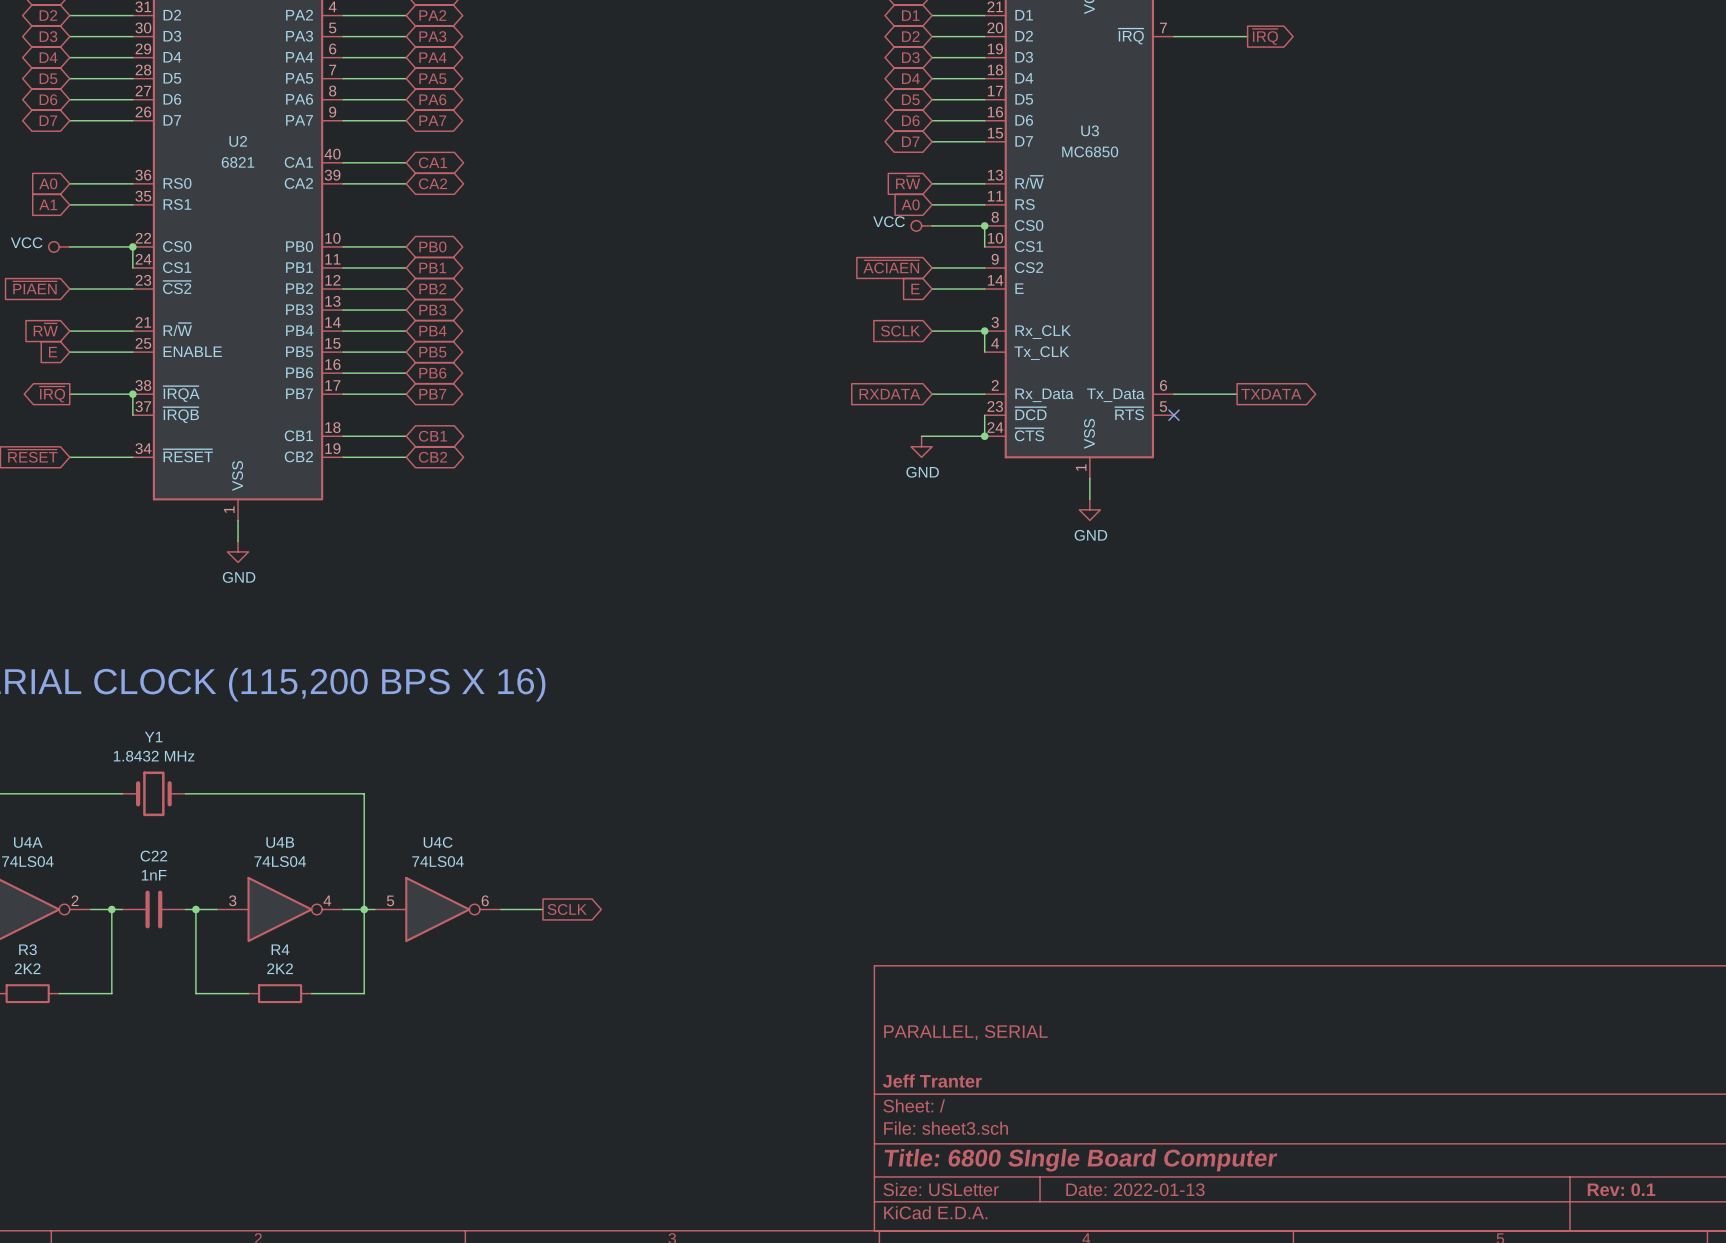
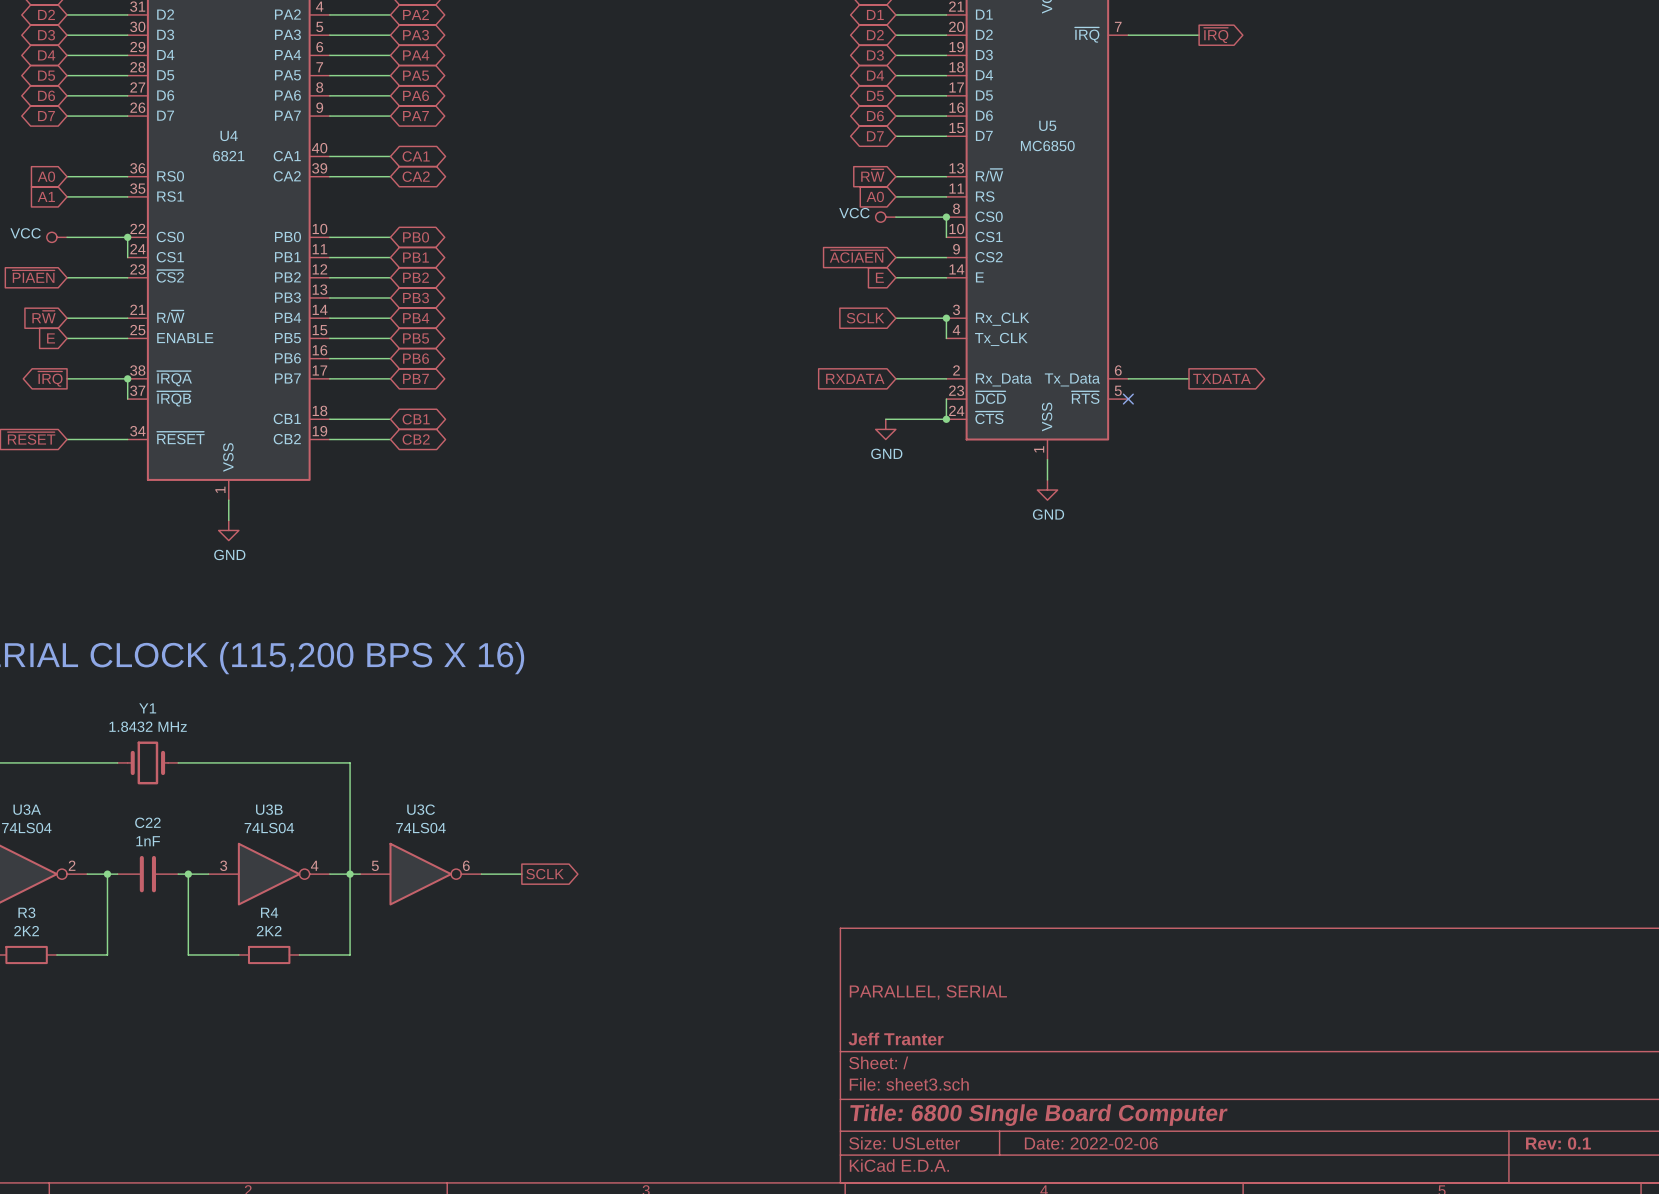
U3 name: U3 (1090, 130) -> U5 (1047, 125)
U2 name: U2 (238, 141) -> U4 (229, 135)
U4A name: U4A (28, 842) -> U3A (27, 809)
U4B name: U4B (280, 842) -> U3B (269, 809)
U4C name: U4C (438, 842) -> U3C (421, 809)
title block: Date: 2022-01-13 (1135, 1189) -> Date: 2022-02-06 (1091, 1143)

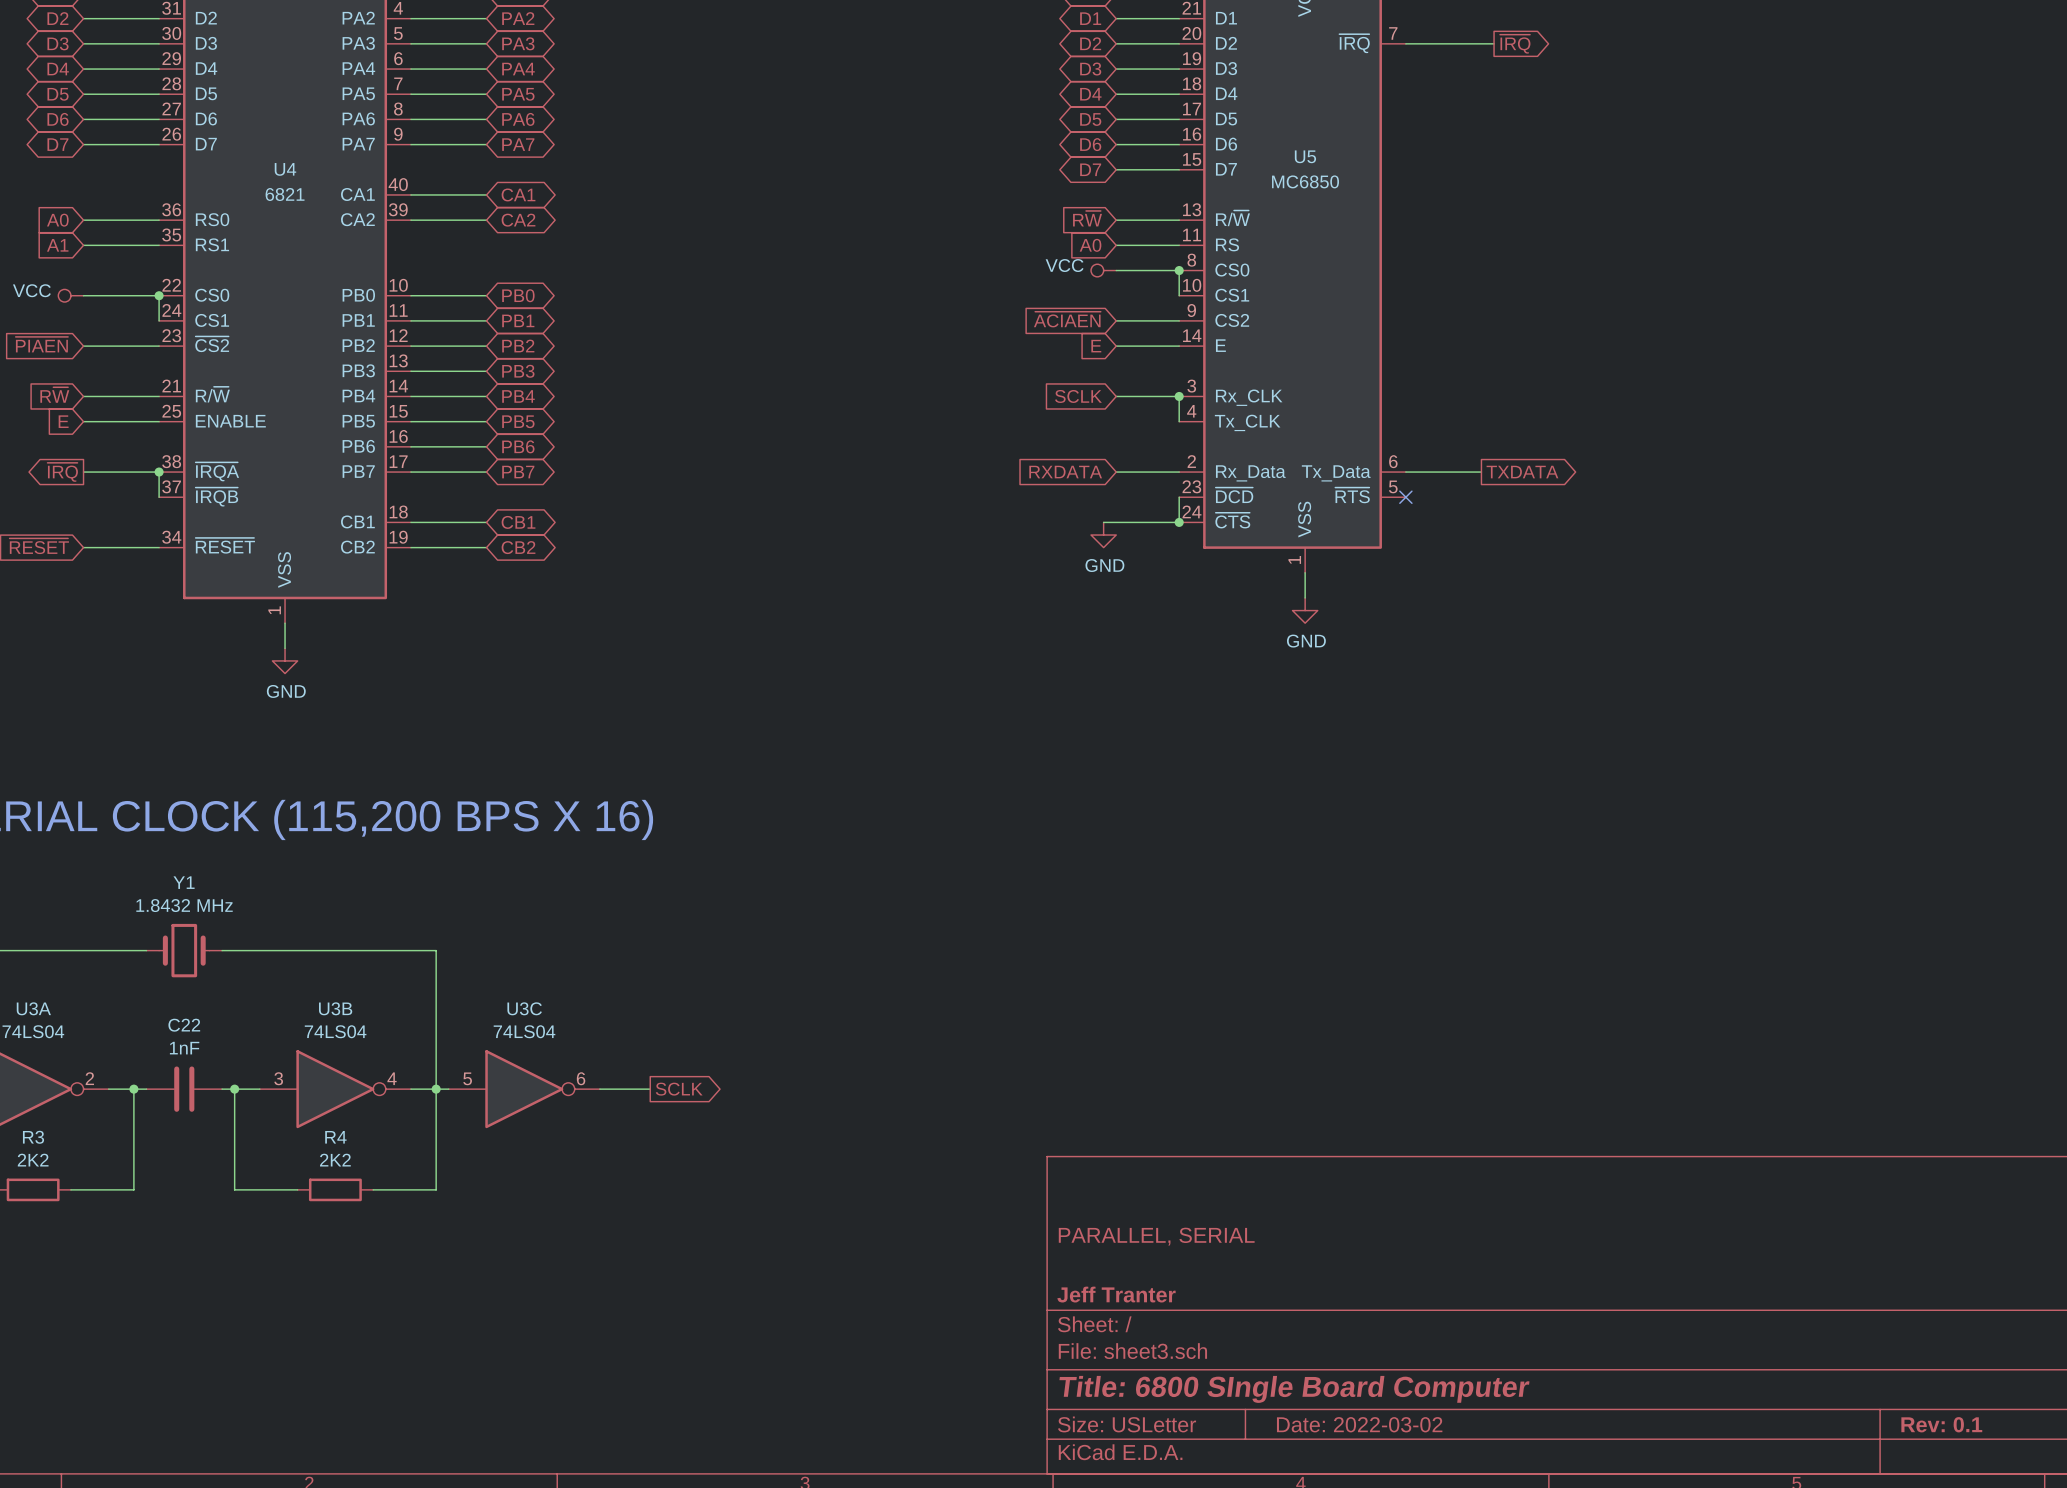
title block: Date: 2022-02-06 (1091, 1143) -> Date: 2022-03-02 (1359, 1424)

